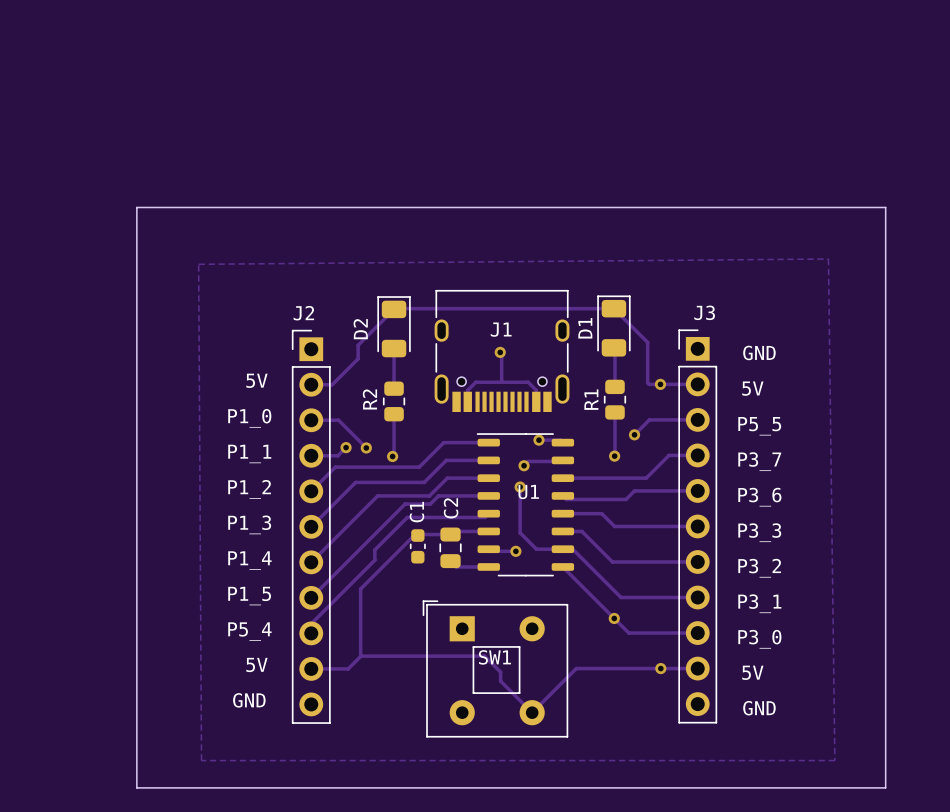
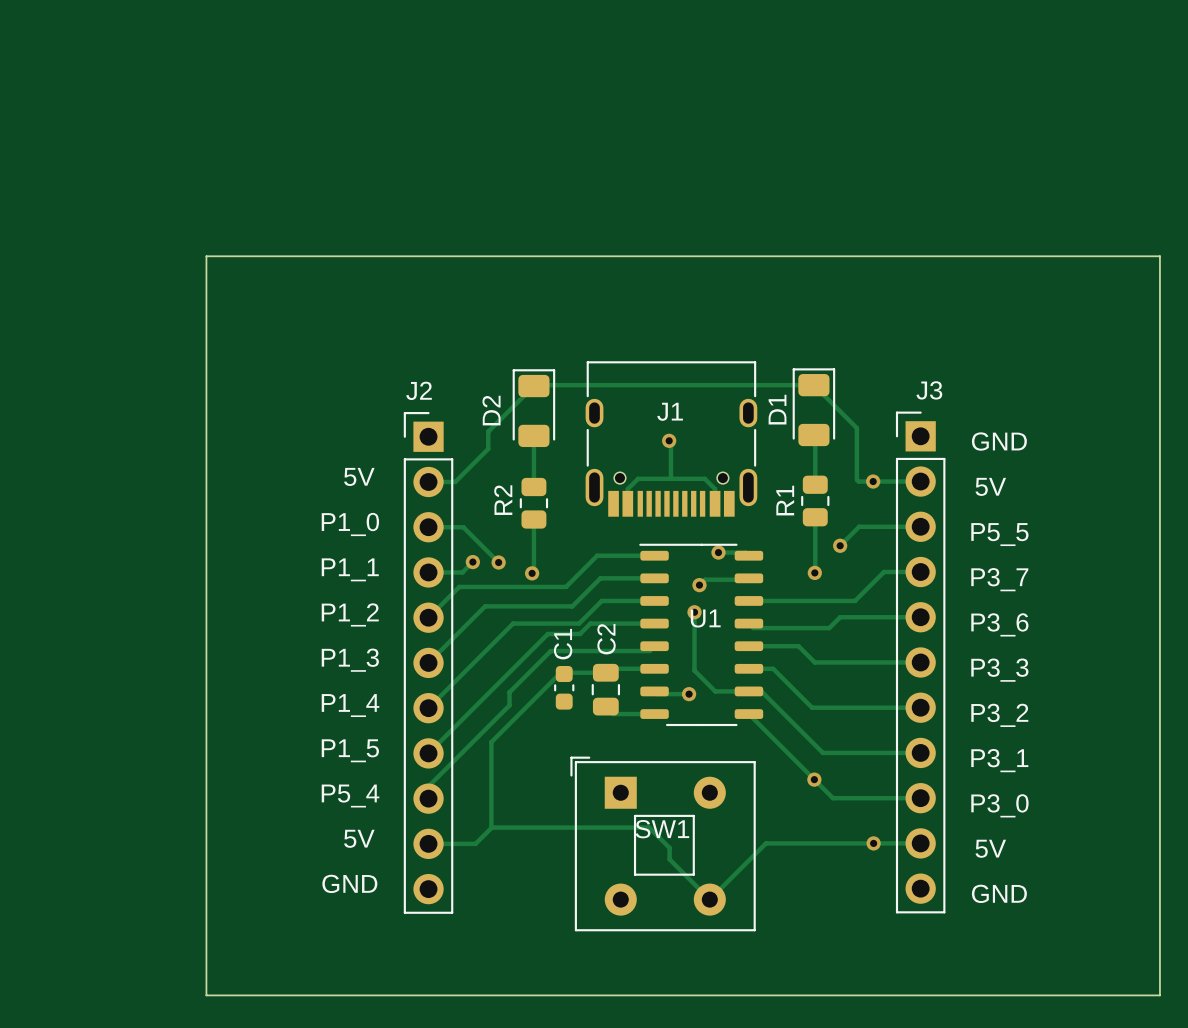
zone outline: (828, 258) (198, 264) (201, 760) (834, 760) (828, 258) -> none

